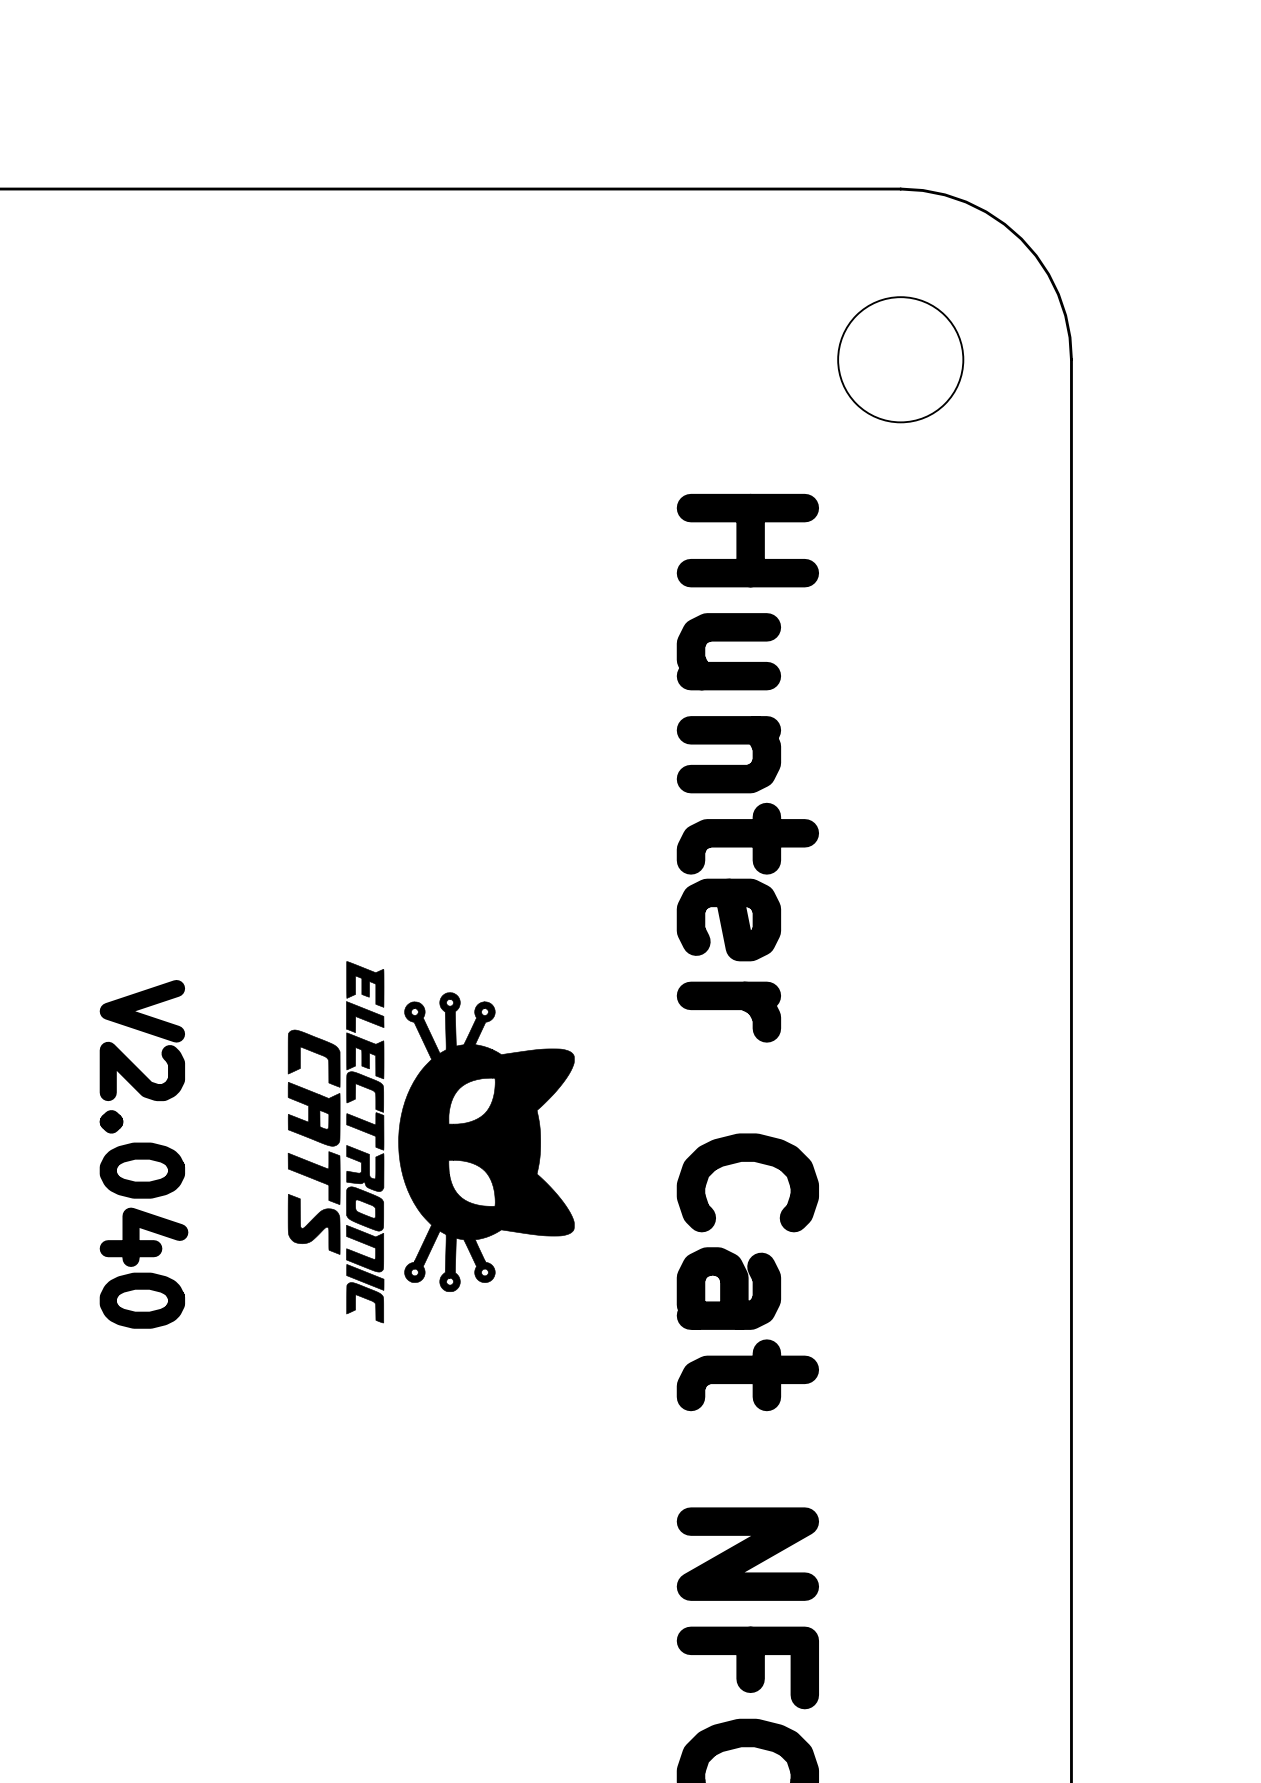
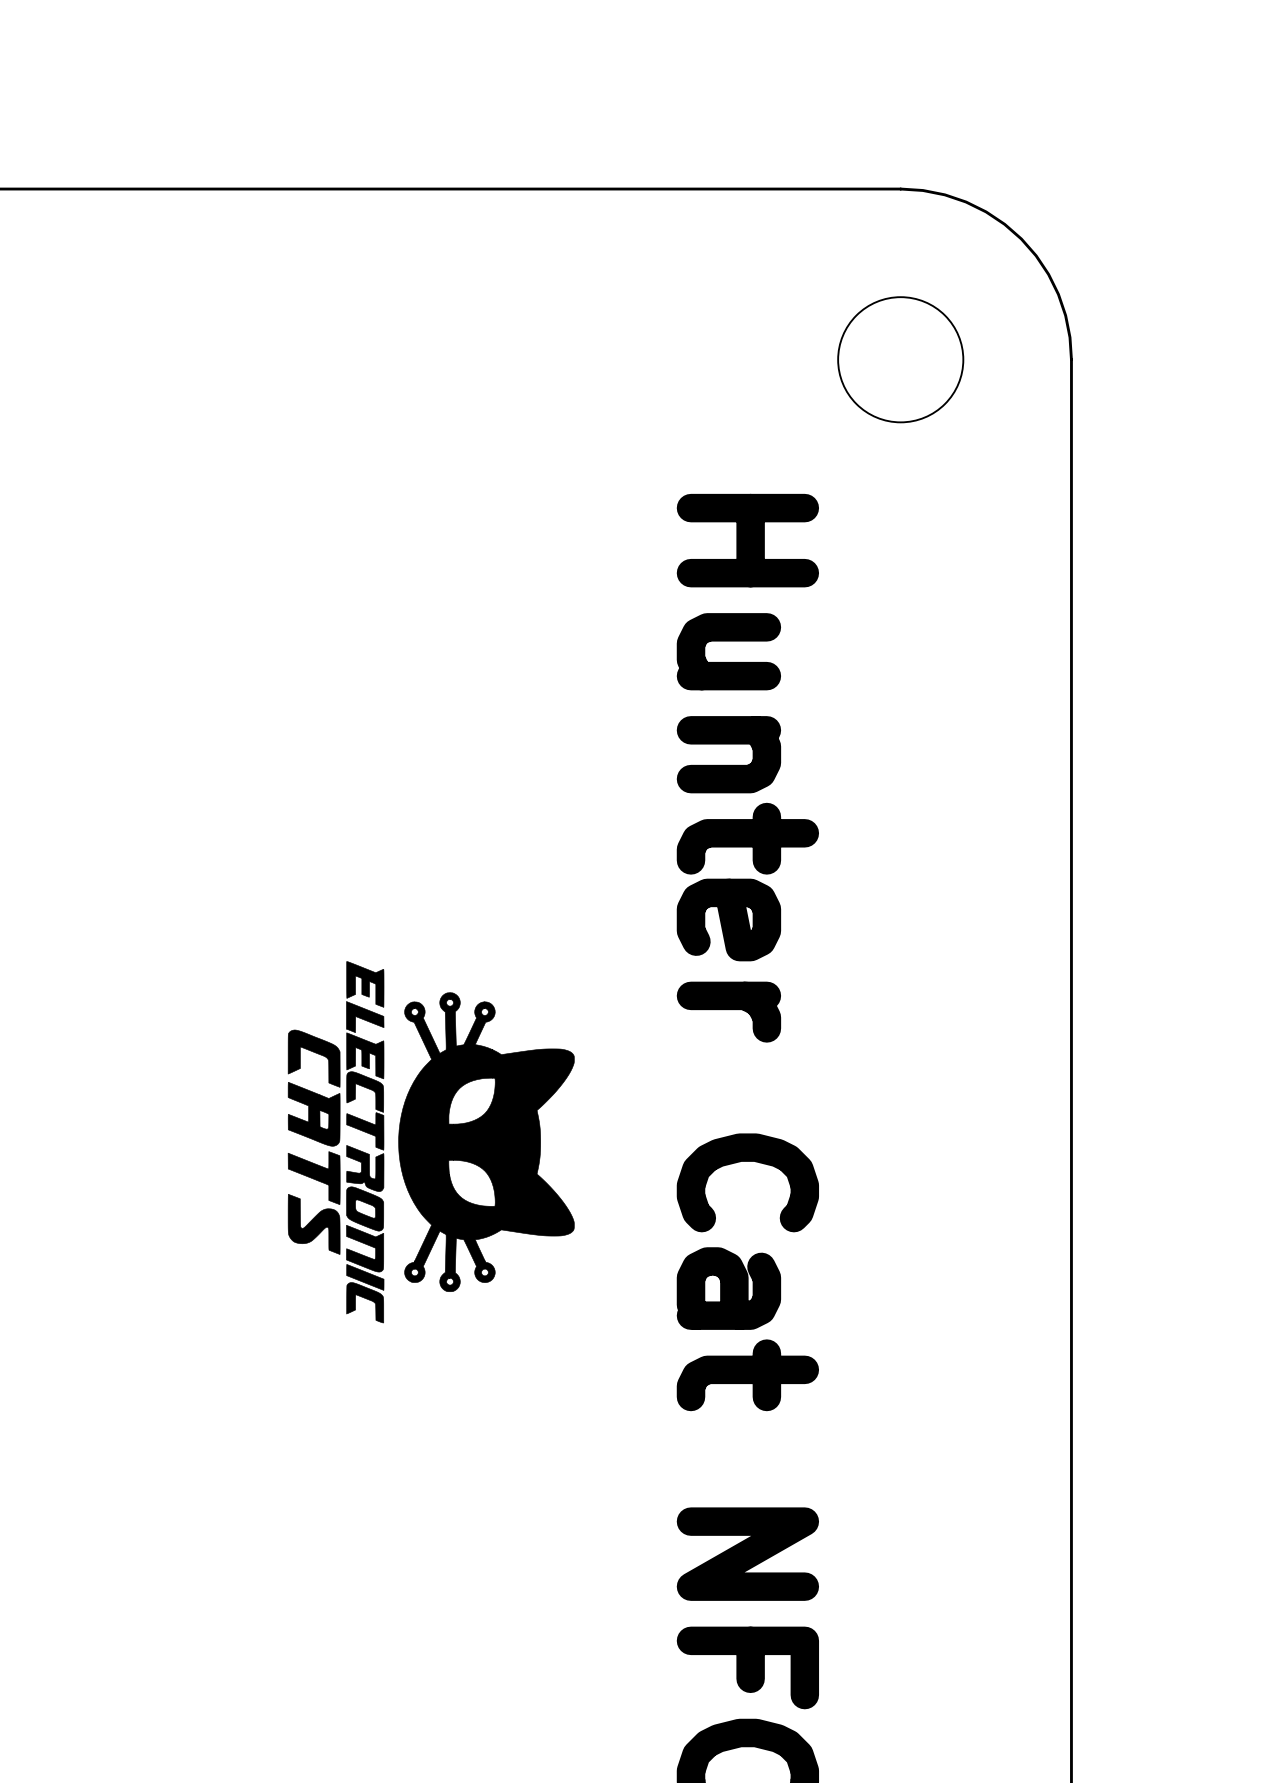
text: V2.040 (144, 1154) -> none

